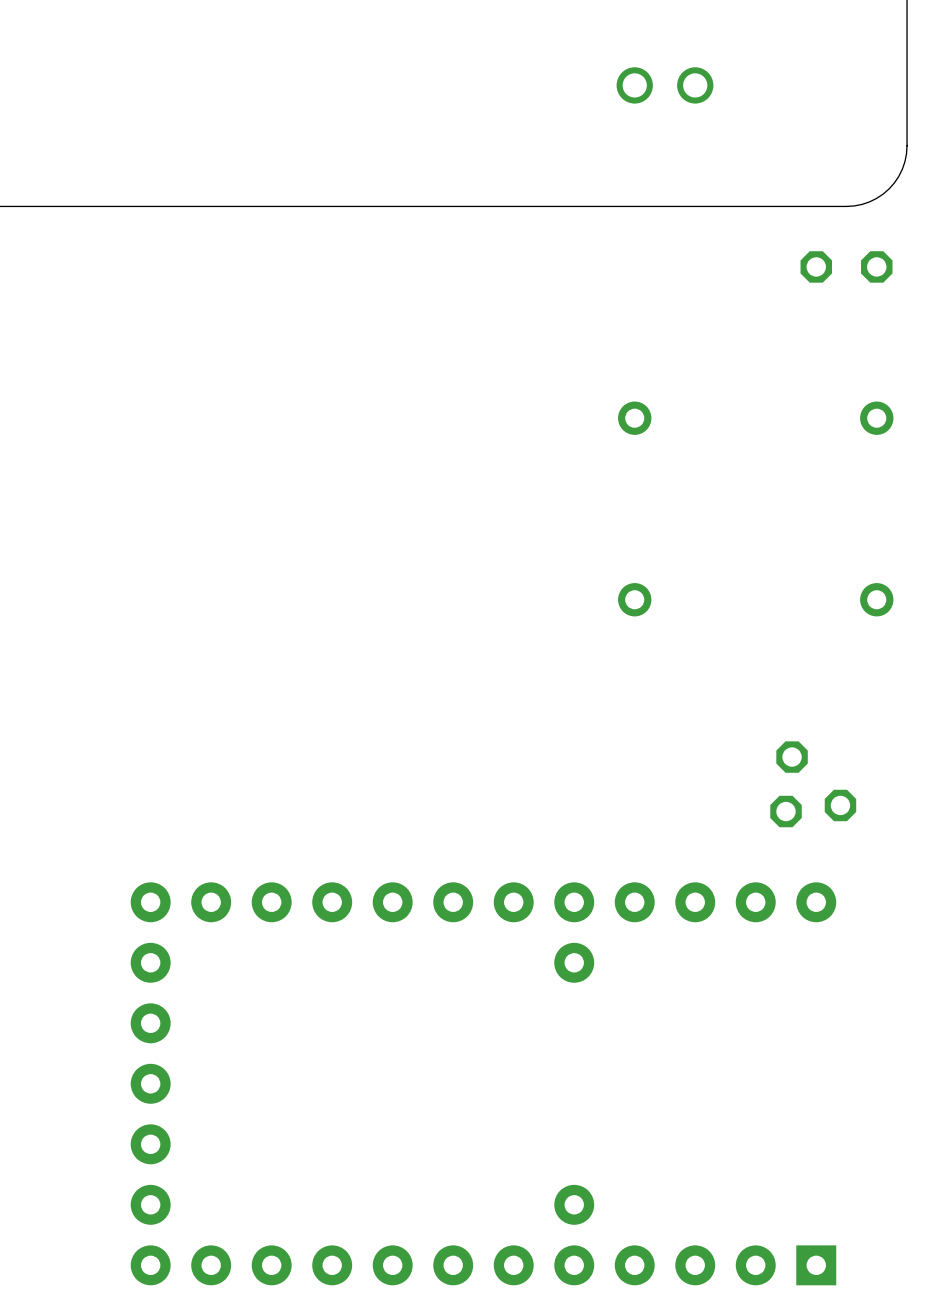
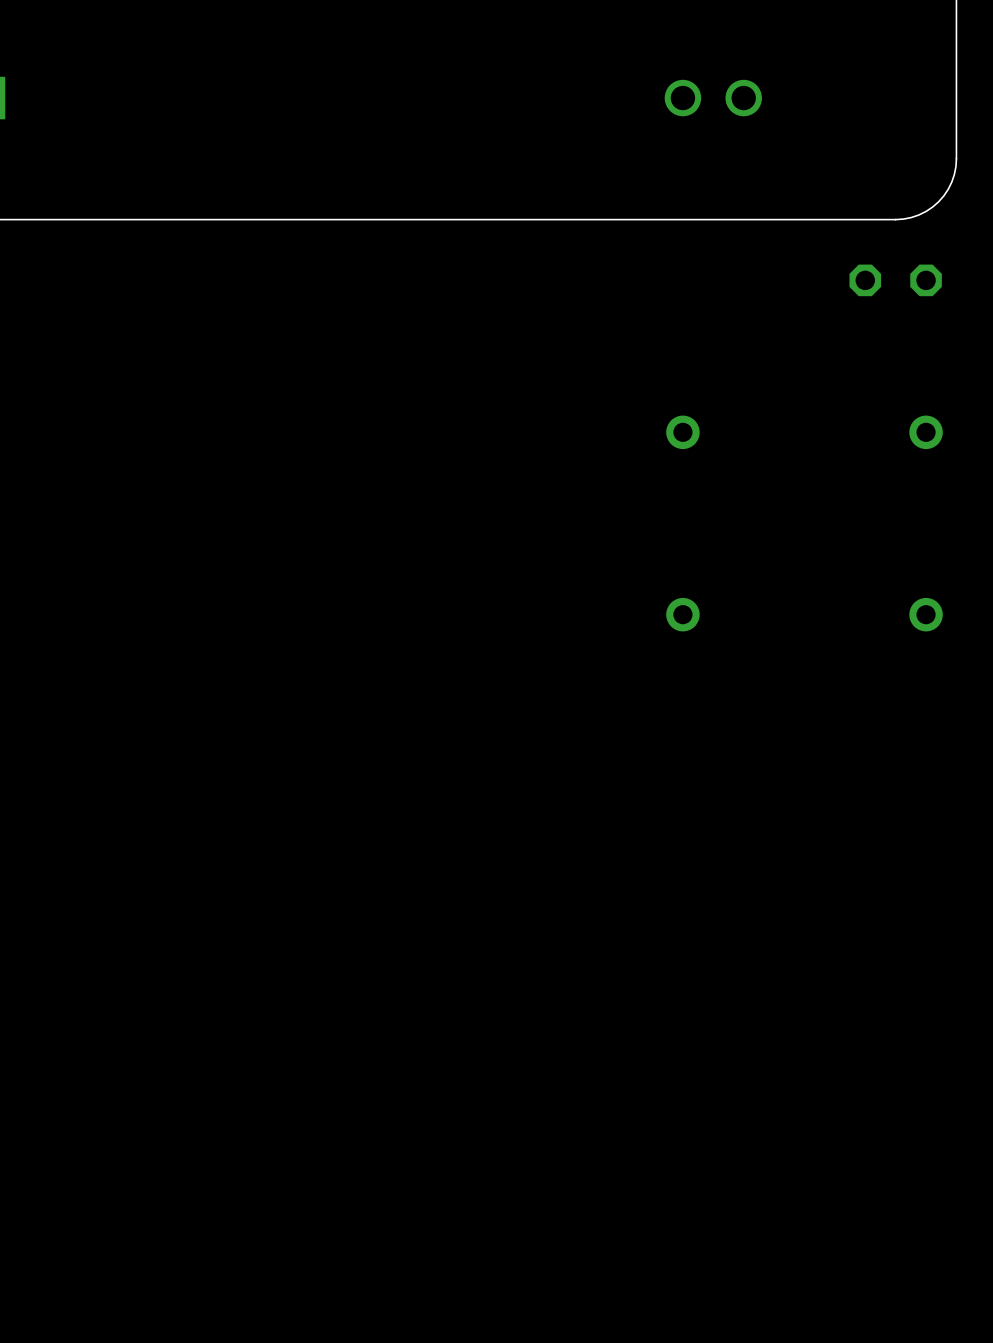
part: (813, 784) -> none
part: (483, 1083) -> none

